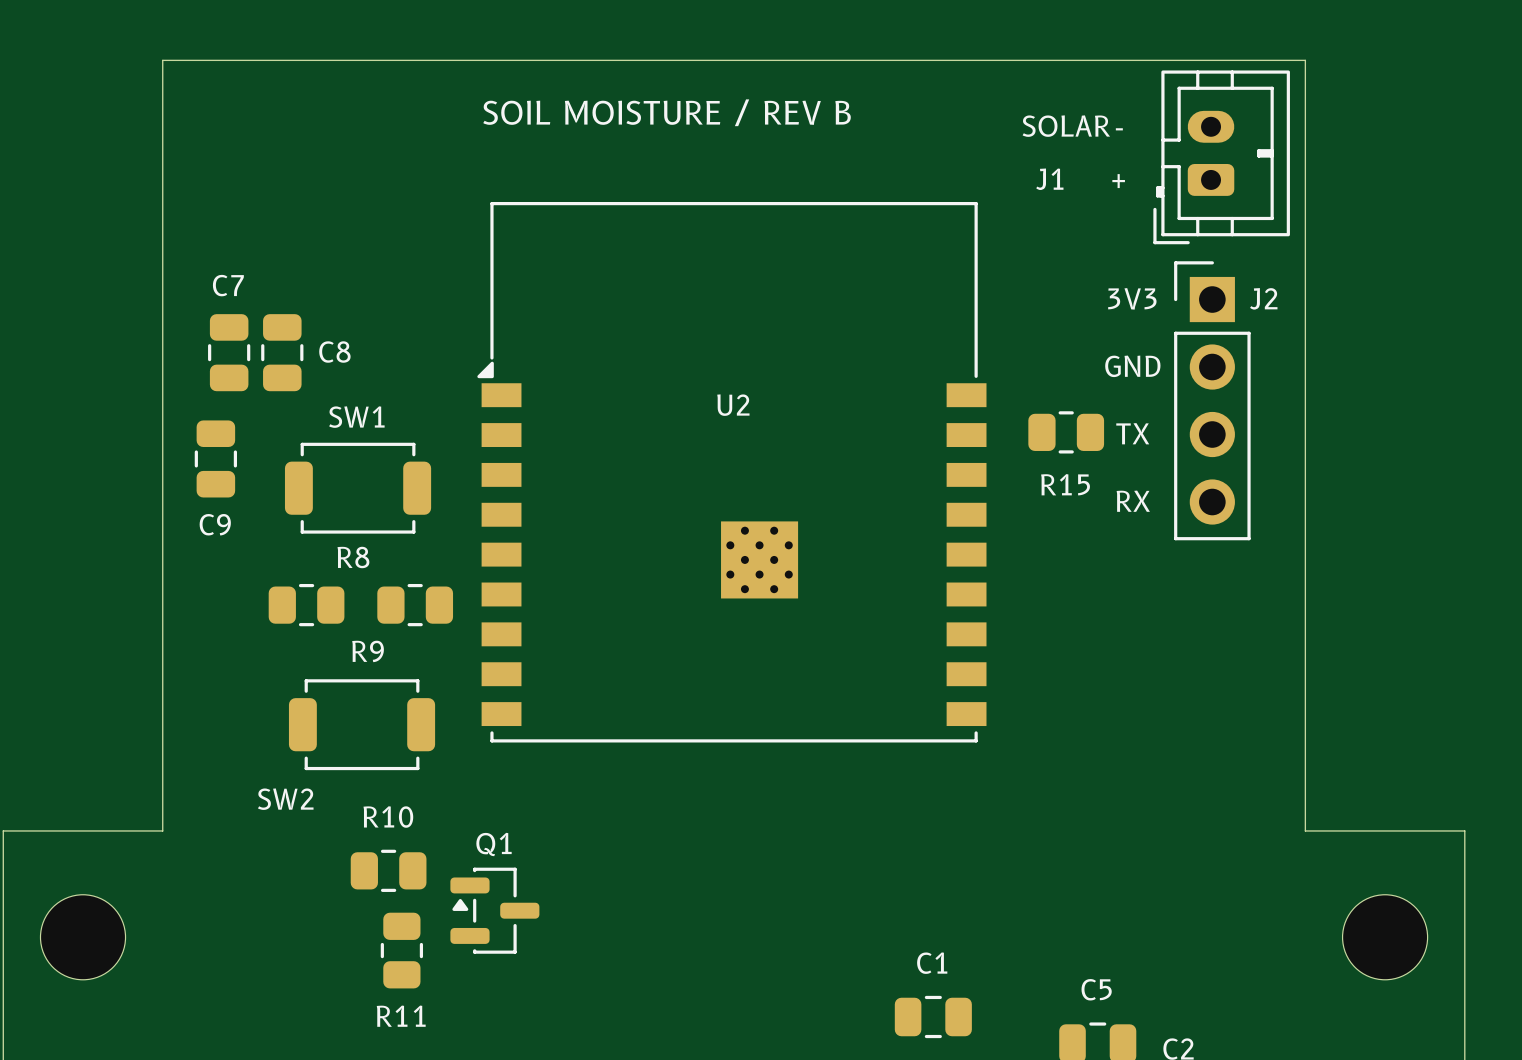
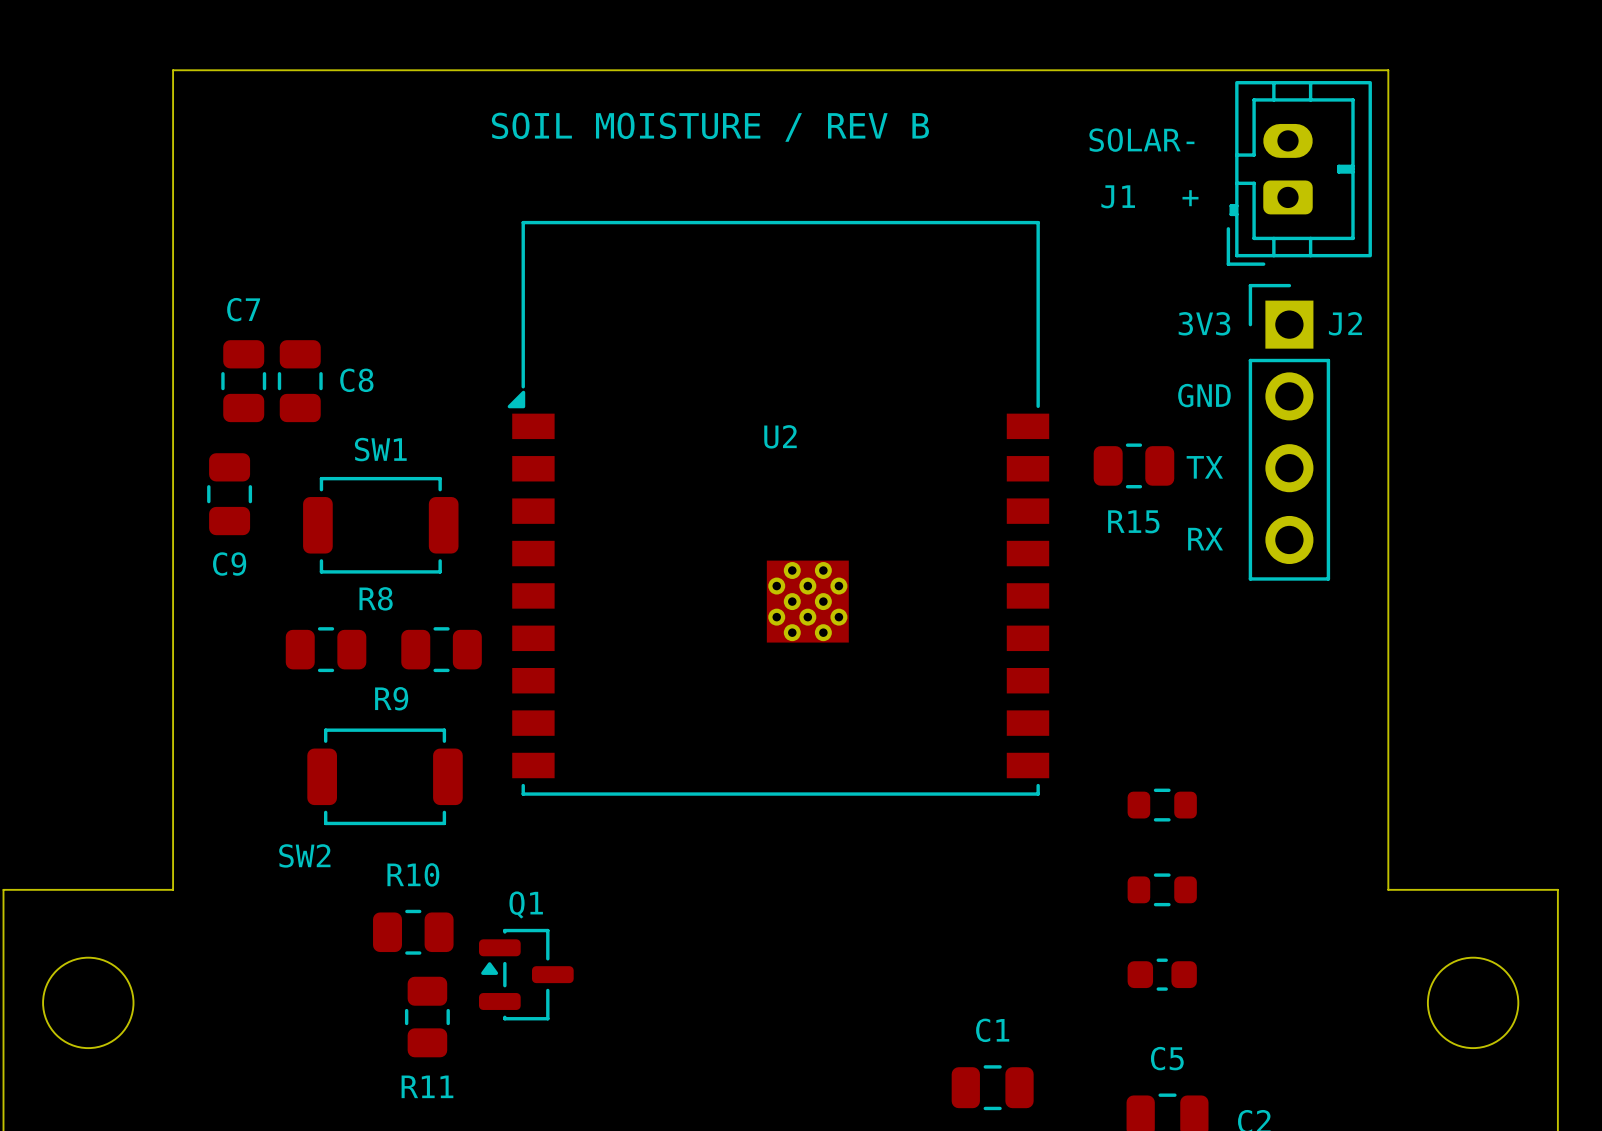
part: none -> (1162, 805)
part: none -> (1162, 889)
part: none -> (1162, 974)

